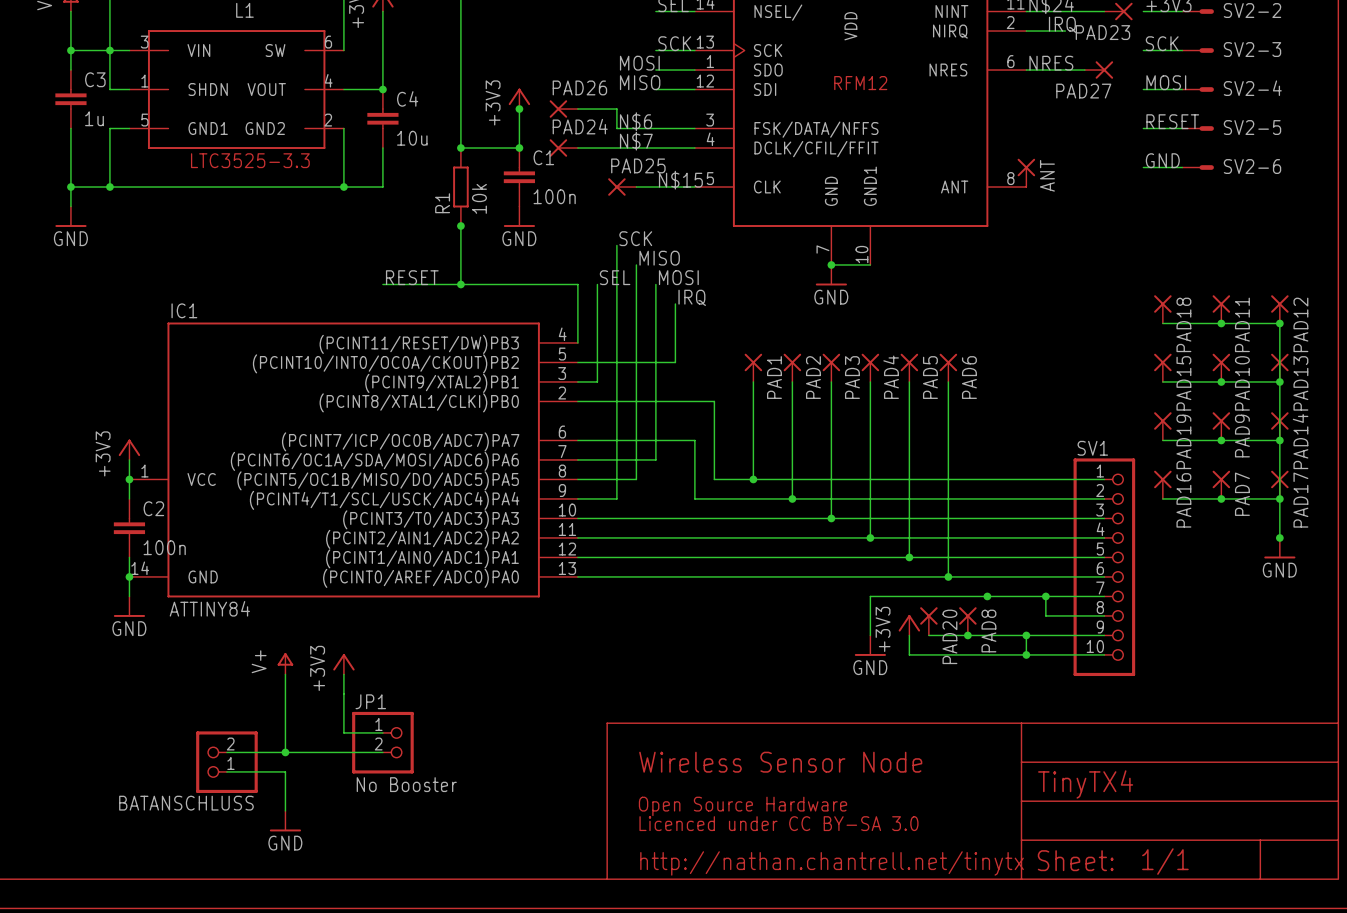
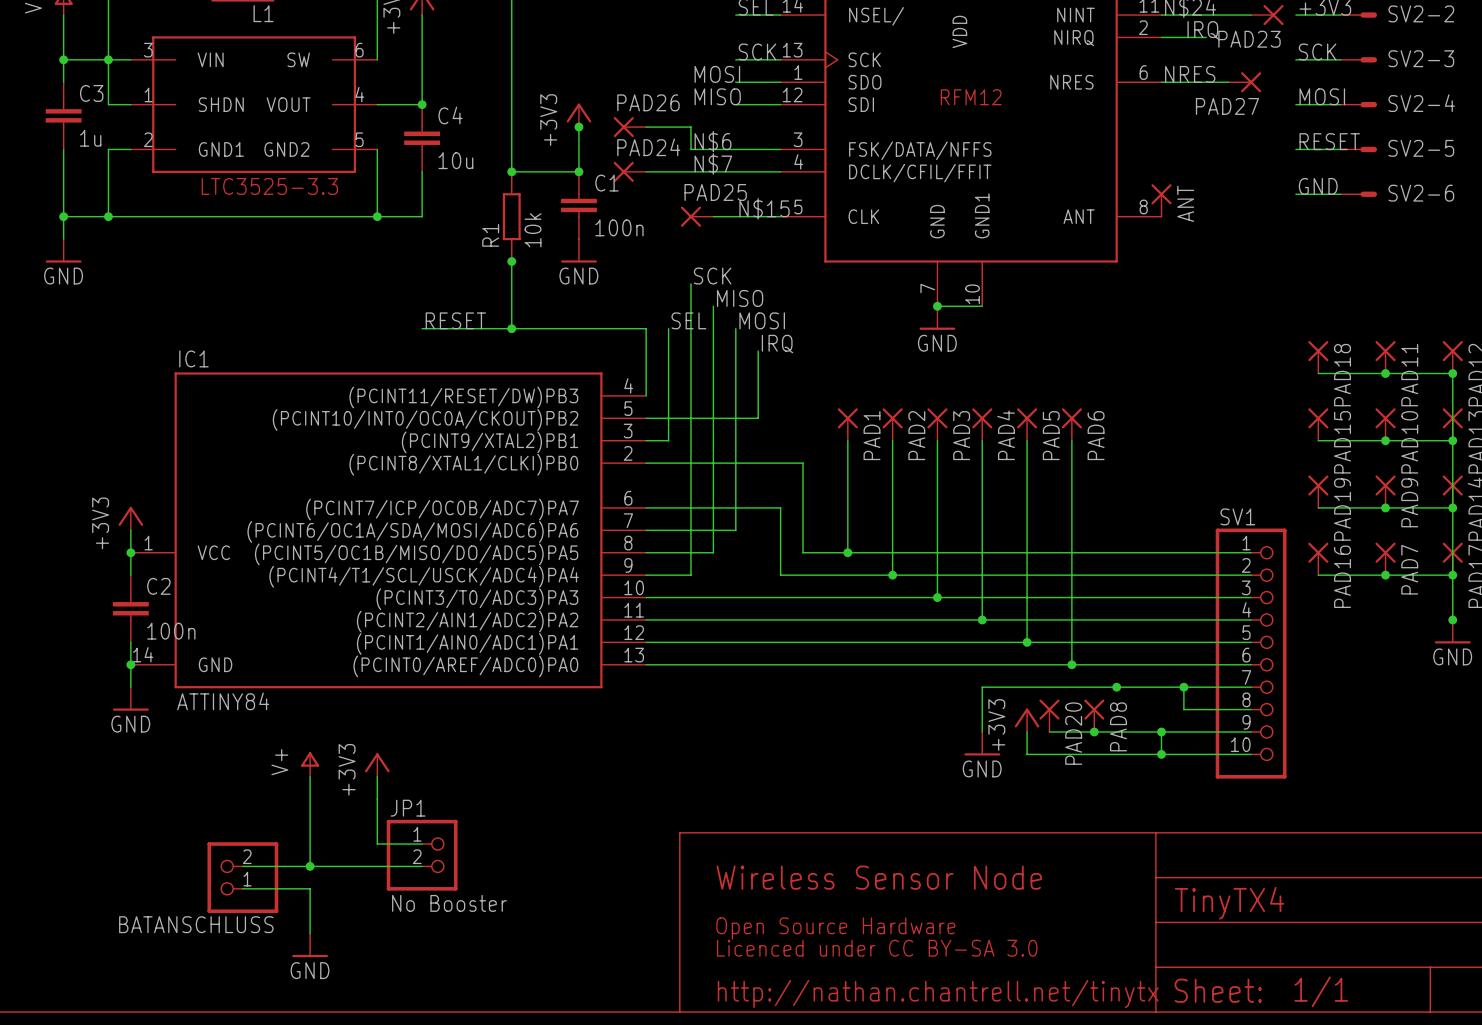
part pin number: 5 (144, 120) -> 2 (148, 139)
part pin number: 2 (328, 120) -> 5 (359, 139)

